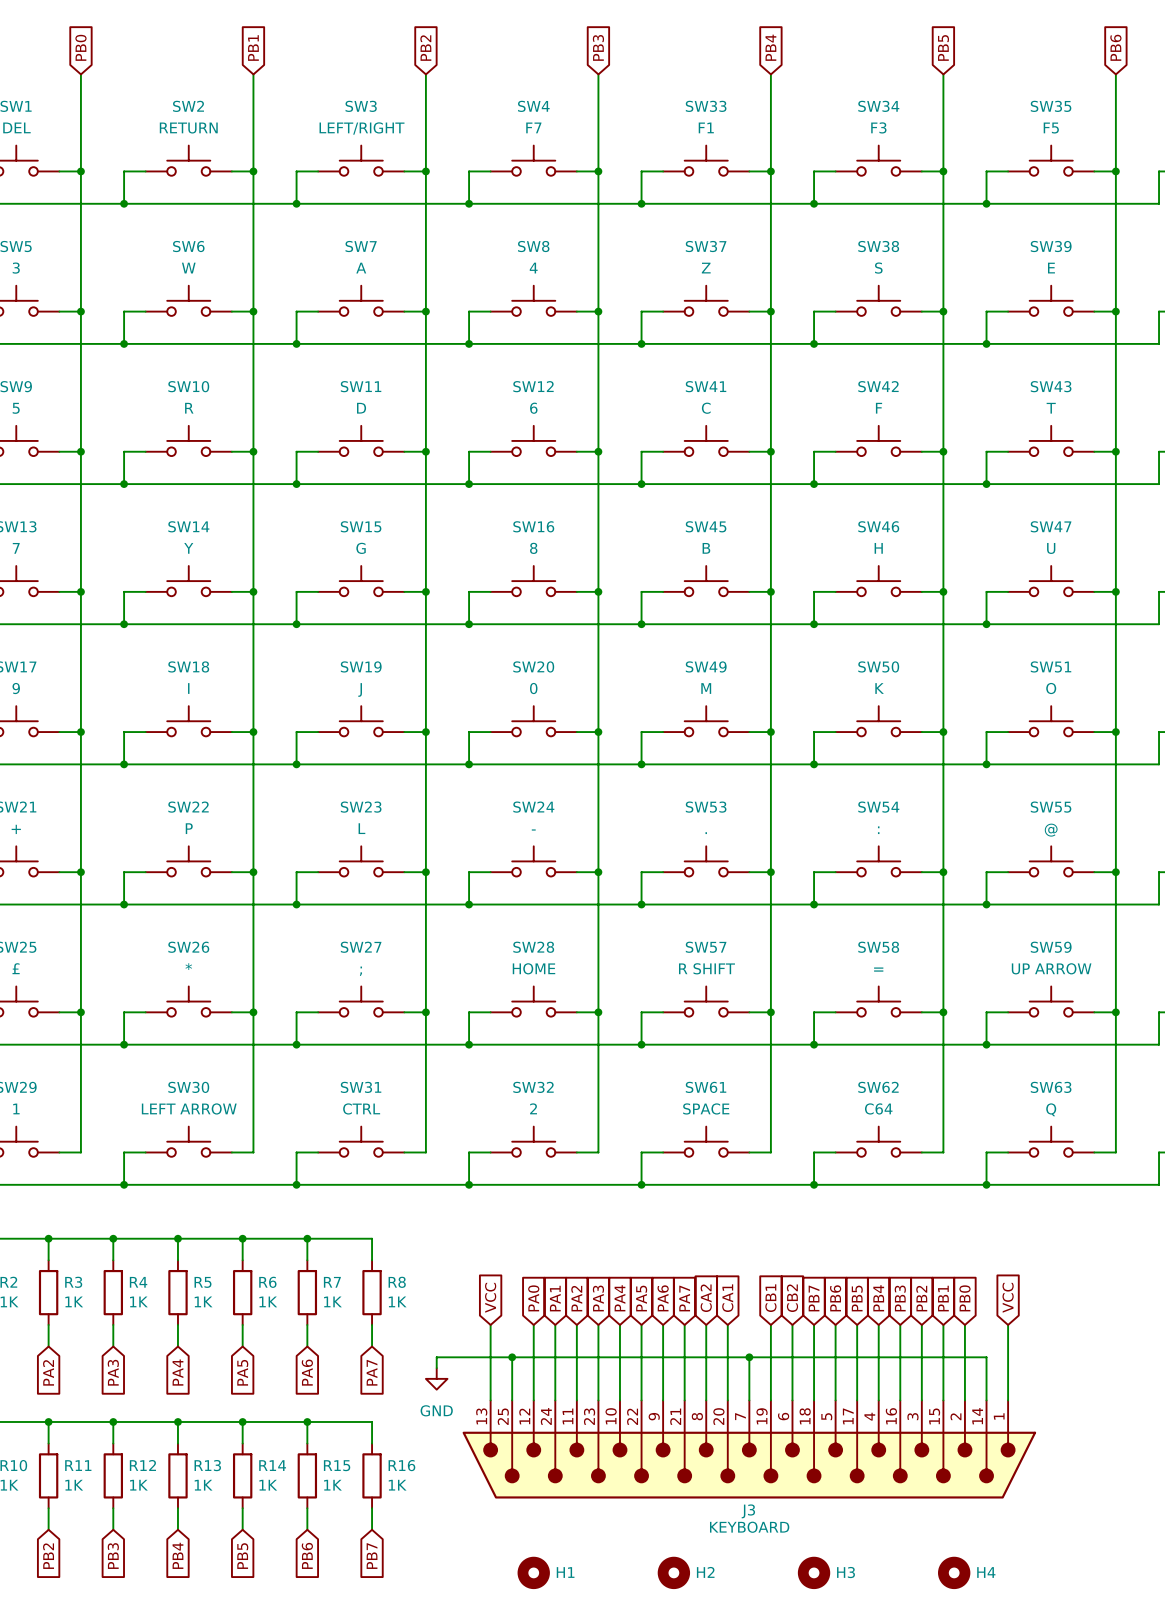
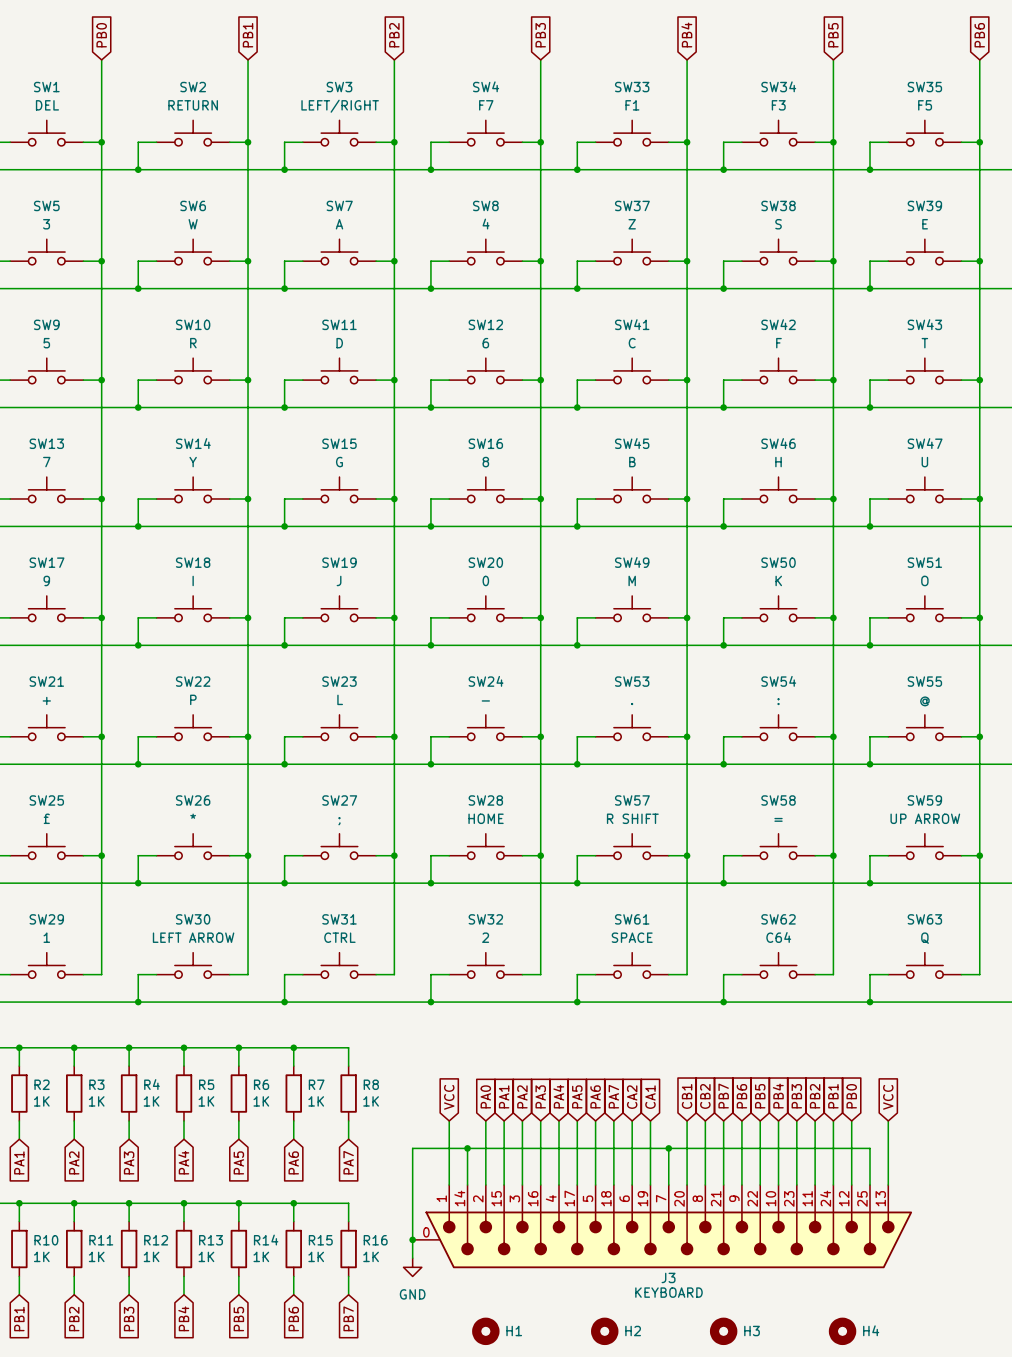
wire: (447, 1357) (436, 1357) (436, 1368) -> (412, 1148) (412, 1258)
power symbol position: GND (436, 1378) -> GND (412, 1267)
J3 symbol: [462, 1400, 1037, 1499] -> [412, 1184, 913, 1269]
junction: none -> (412, 1239)

